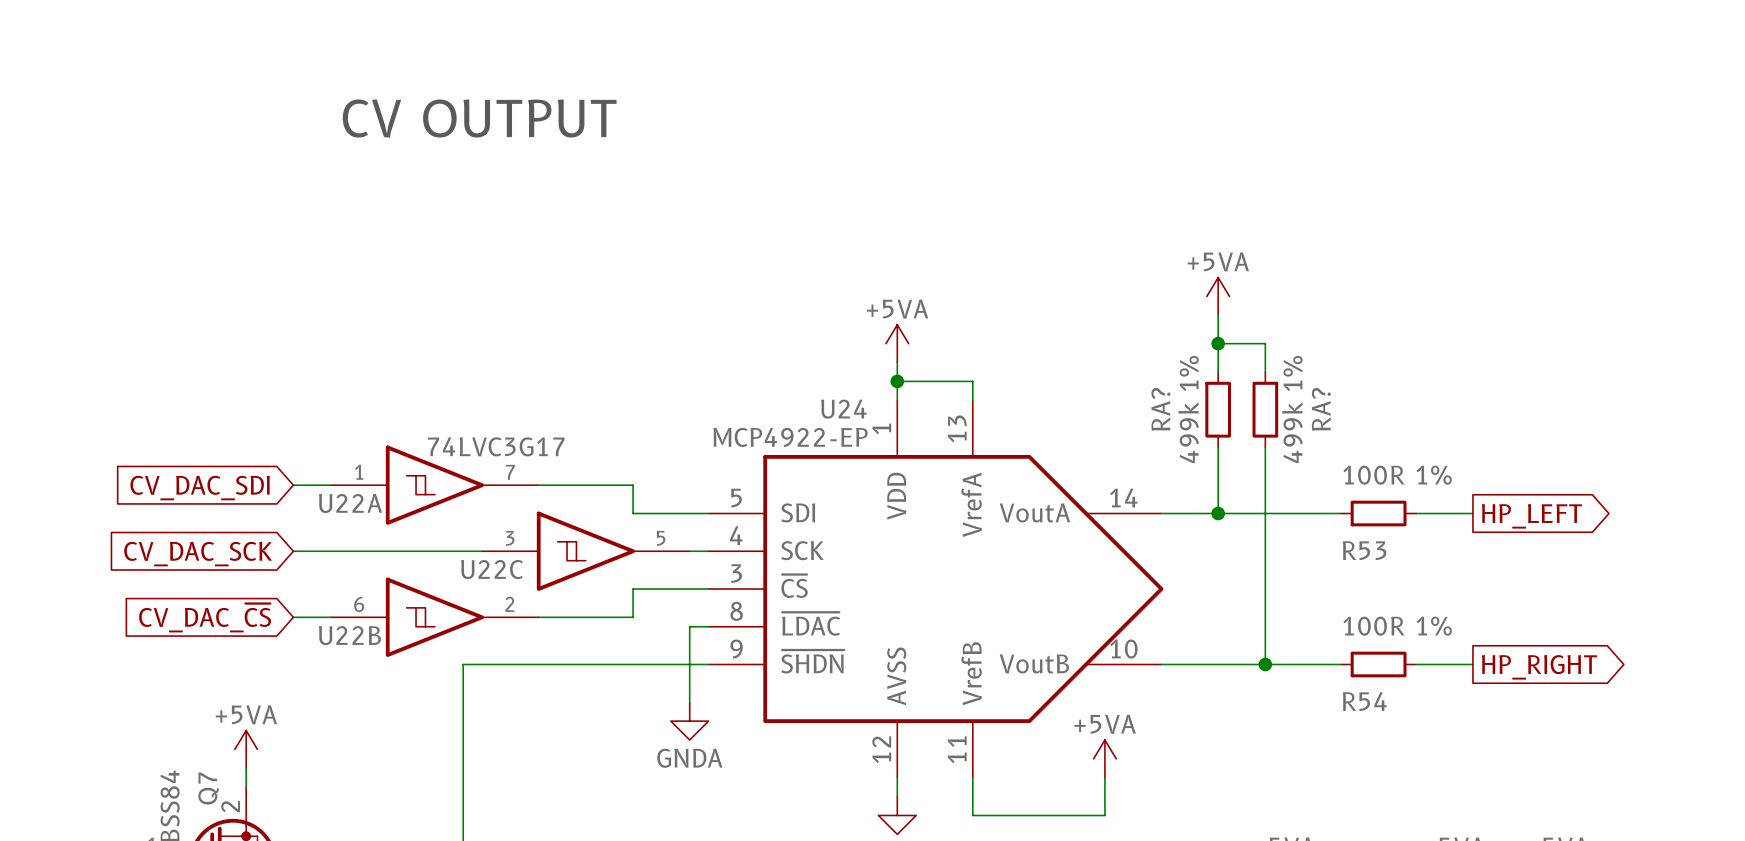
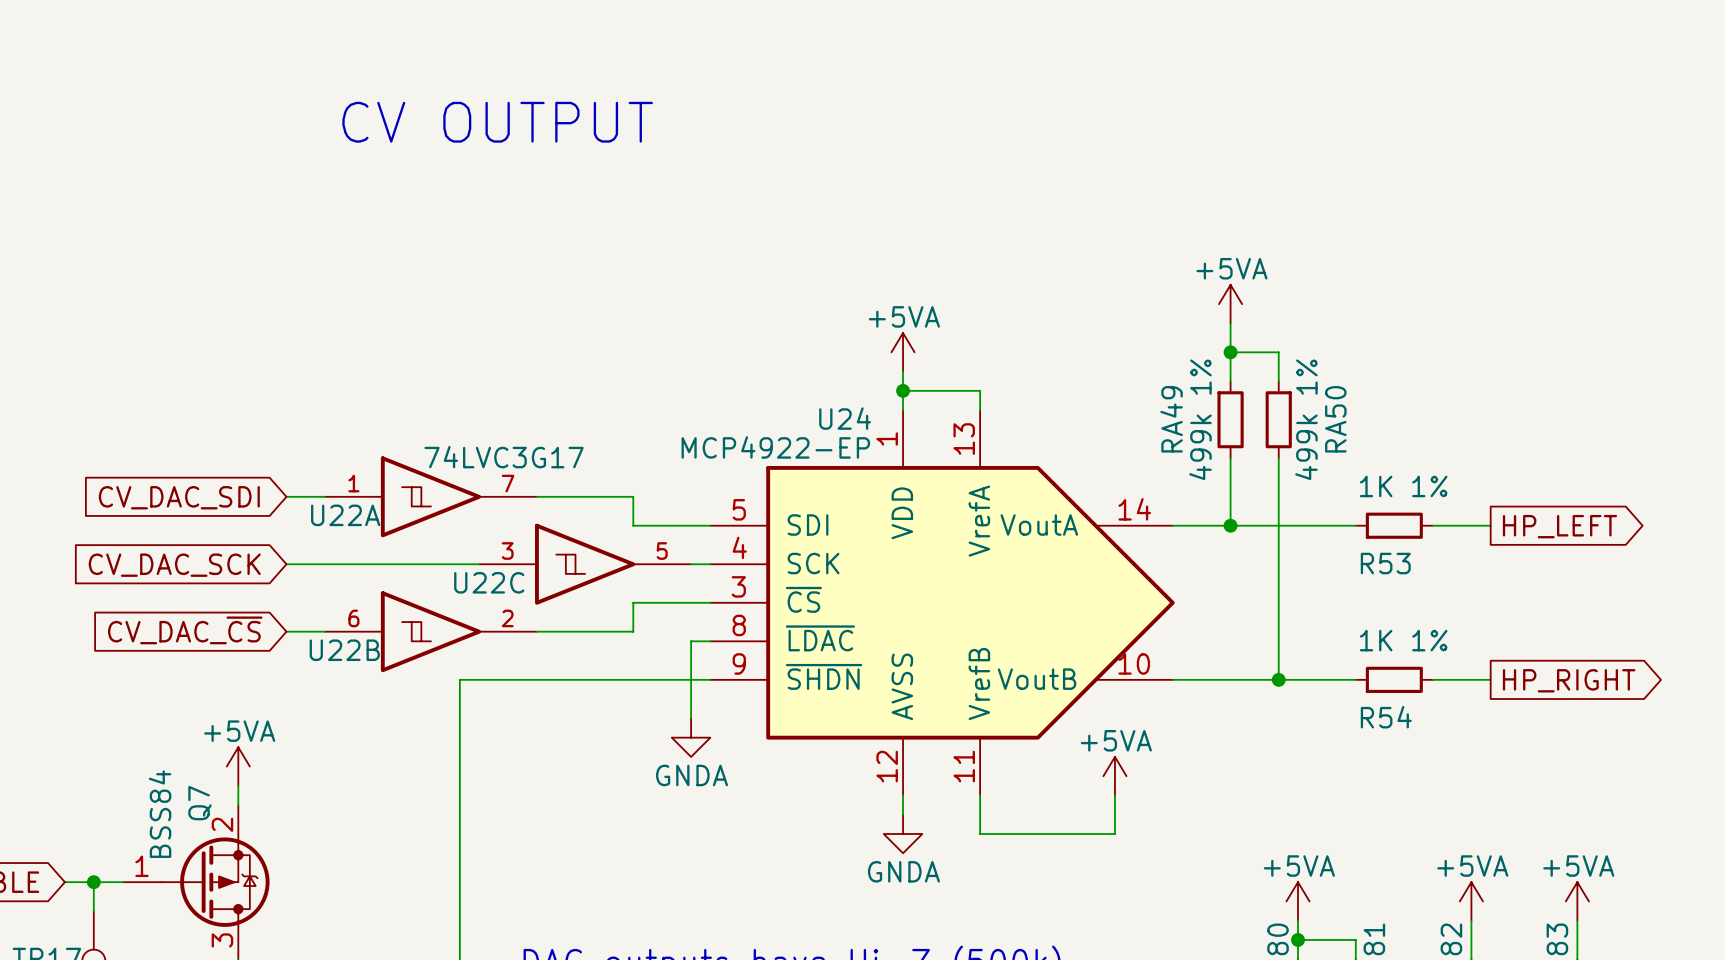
RA? name: RA? (1160, 409) -> RA49 (1171, 419)
RA? name: RA? (1321, 409) -> RA50 (1335, 419)
R53 value: 100R 1% (1397, 475) -> 1K 1% (1403, 486)
R54 value: 100R 1% (1397, 626) -> 1K 1% (1403, 640)

